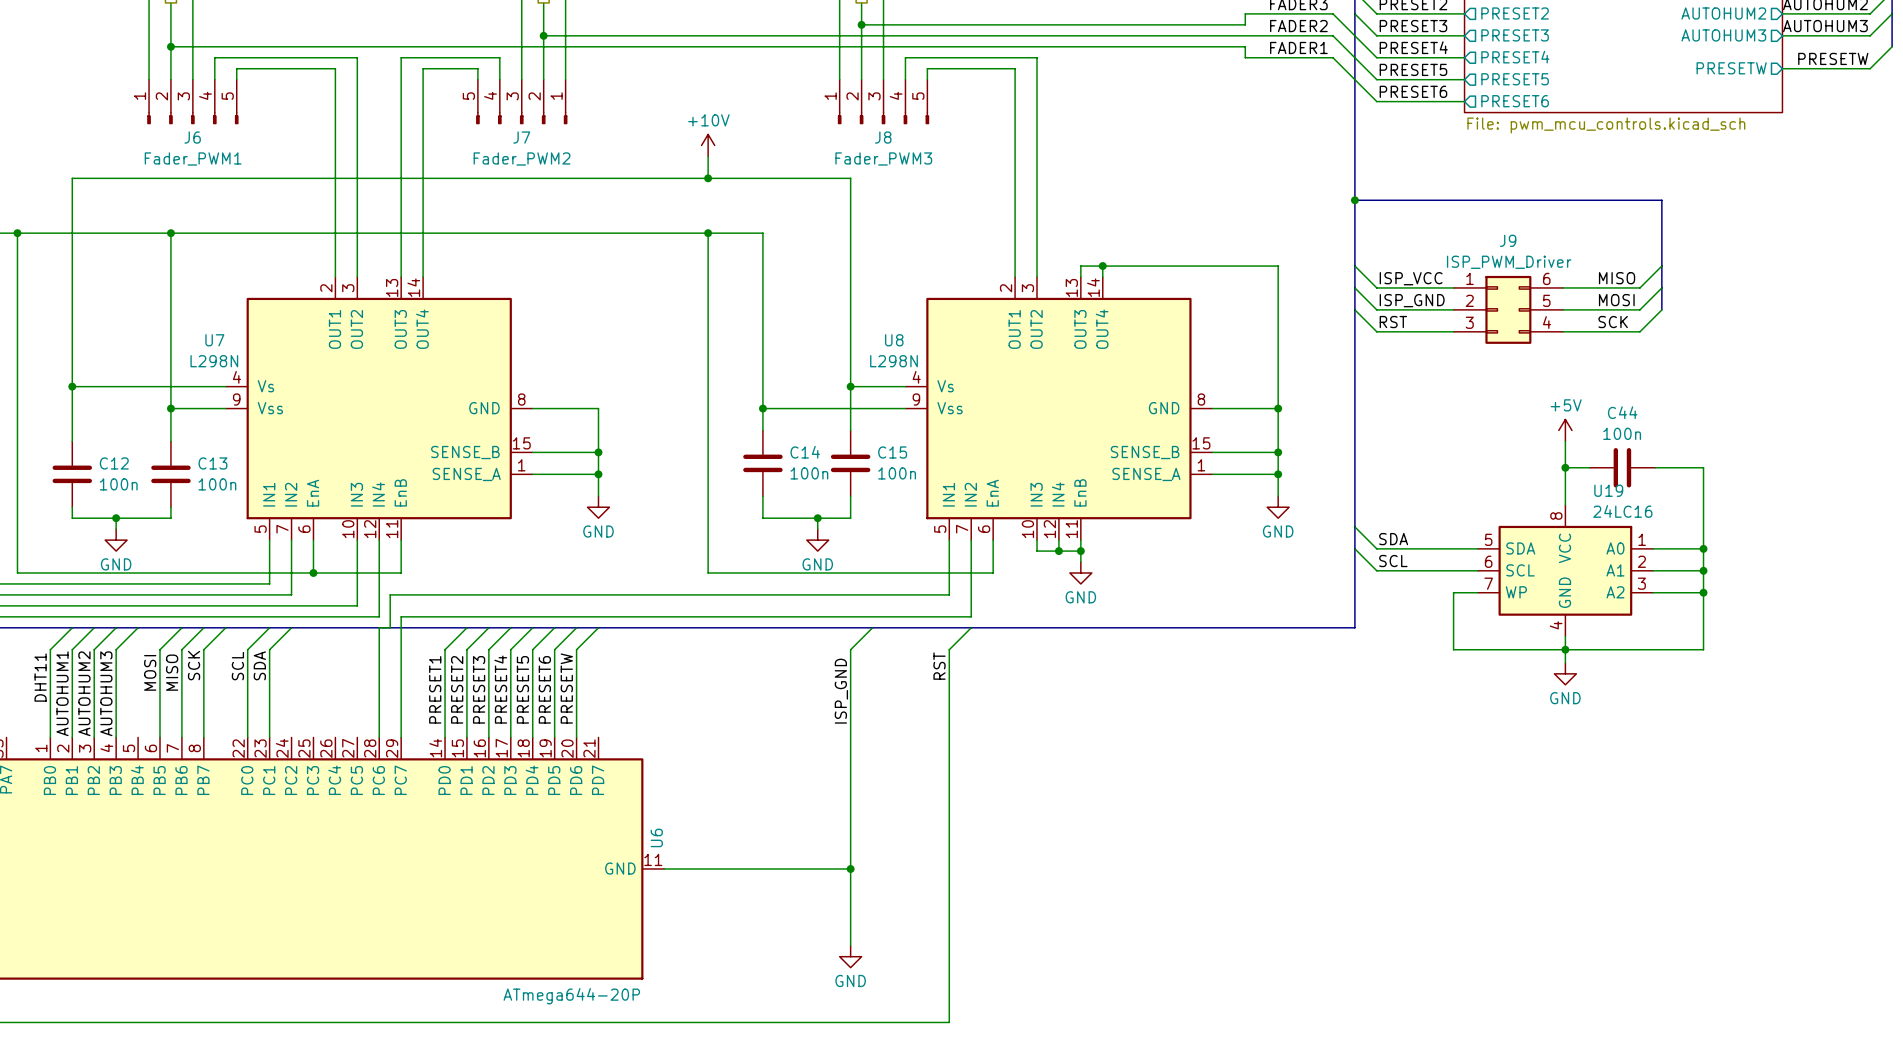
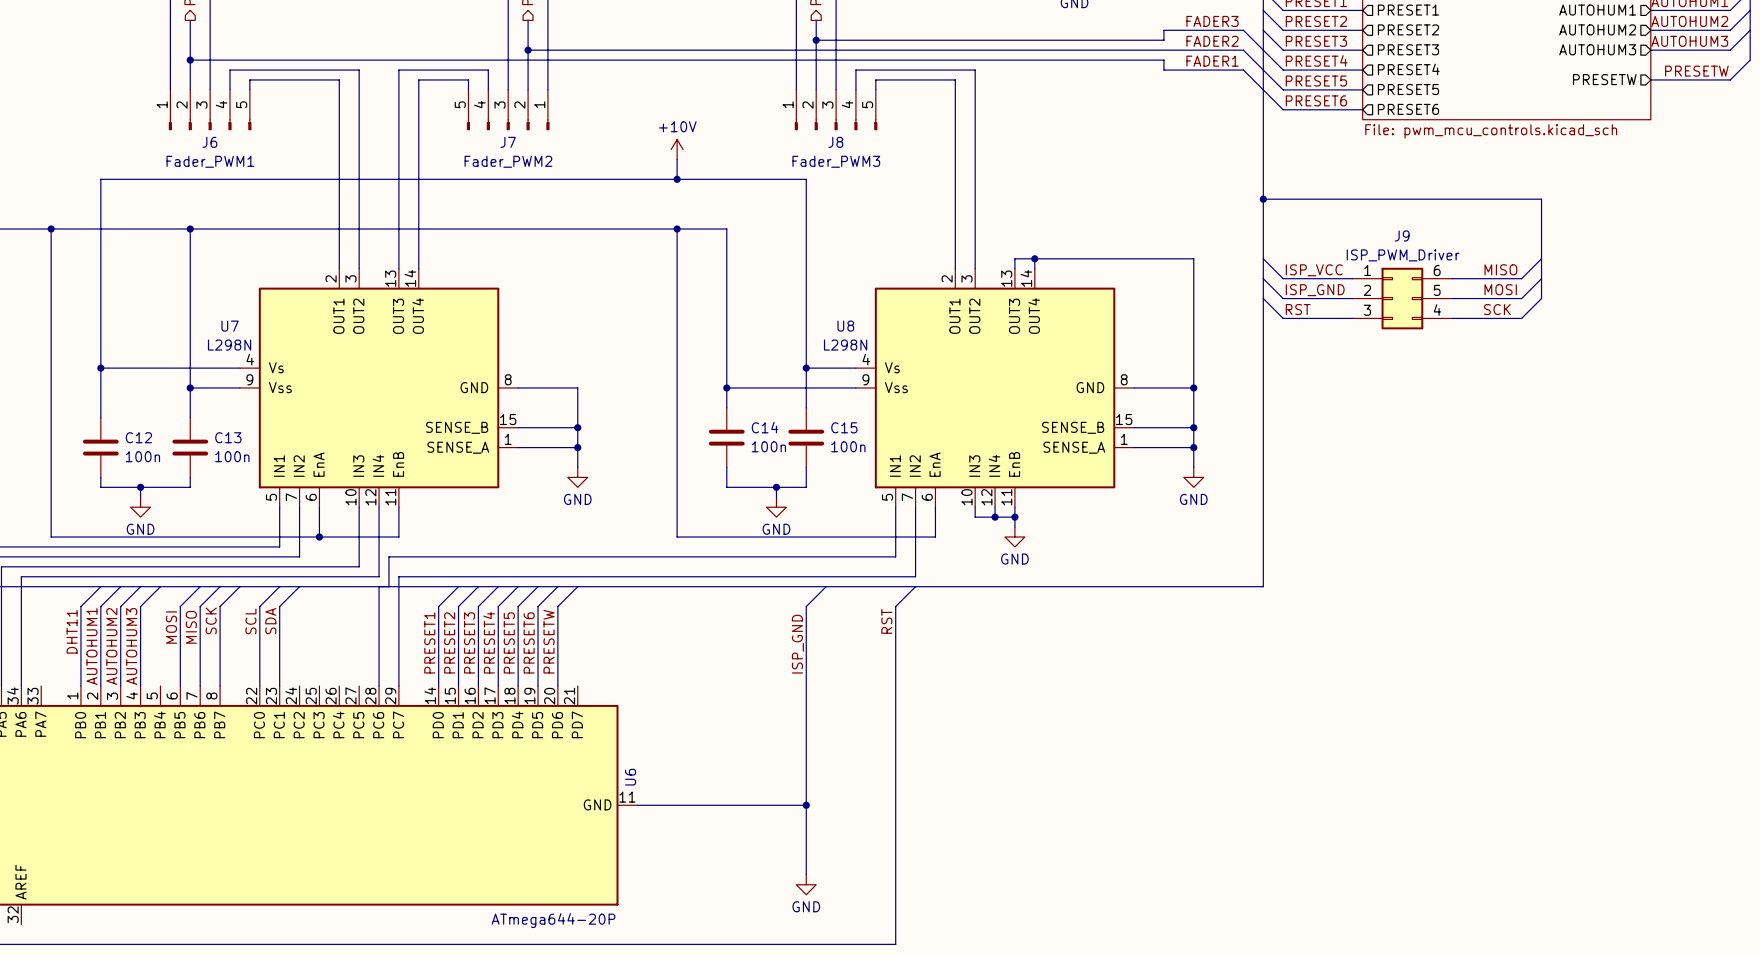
power symbol: +5V (1565, 430) -> none
wire: (1565, 441) (1565, 505) -> none
wire: (1565, 467) (1589, 467) -> none
junction: (1565, 467) -> none
C44: 100n (1622, 467) -> none
wire: (1655, 467) (1703, 467) (1703, 649) (1453, 649) (1453, 592) (1477, 592) -> none
wire: (1354, 526) (1376, 548) (1477, 548) -> none
label: SDA (1393, 539) -> none
wire: (1354, 548) (1376, 570) (1477, 570) -> none
wire: (1653, 548) (1703, 548) -> none
junction: (1703, 548) -> none
label: SCL (1393, 561) -> none
U19: 24LC16 (1565, 570) -> none
wire: (1653, 570) (1703, 570) -> none
junction: (1703, 570) -> none
wire: (1653, 592) (1703, 592) -> none
junction: (1703, 592) -> none
wire: (1565, 636) (1565, 662) -> none
junction: (1565, 649) -> none
power symbol: GND (1565, 673) -> none

